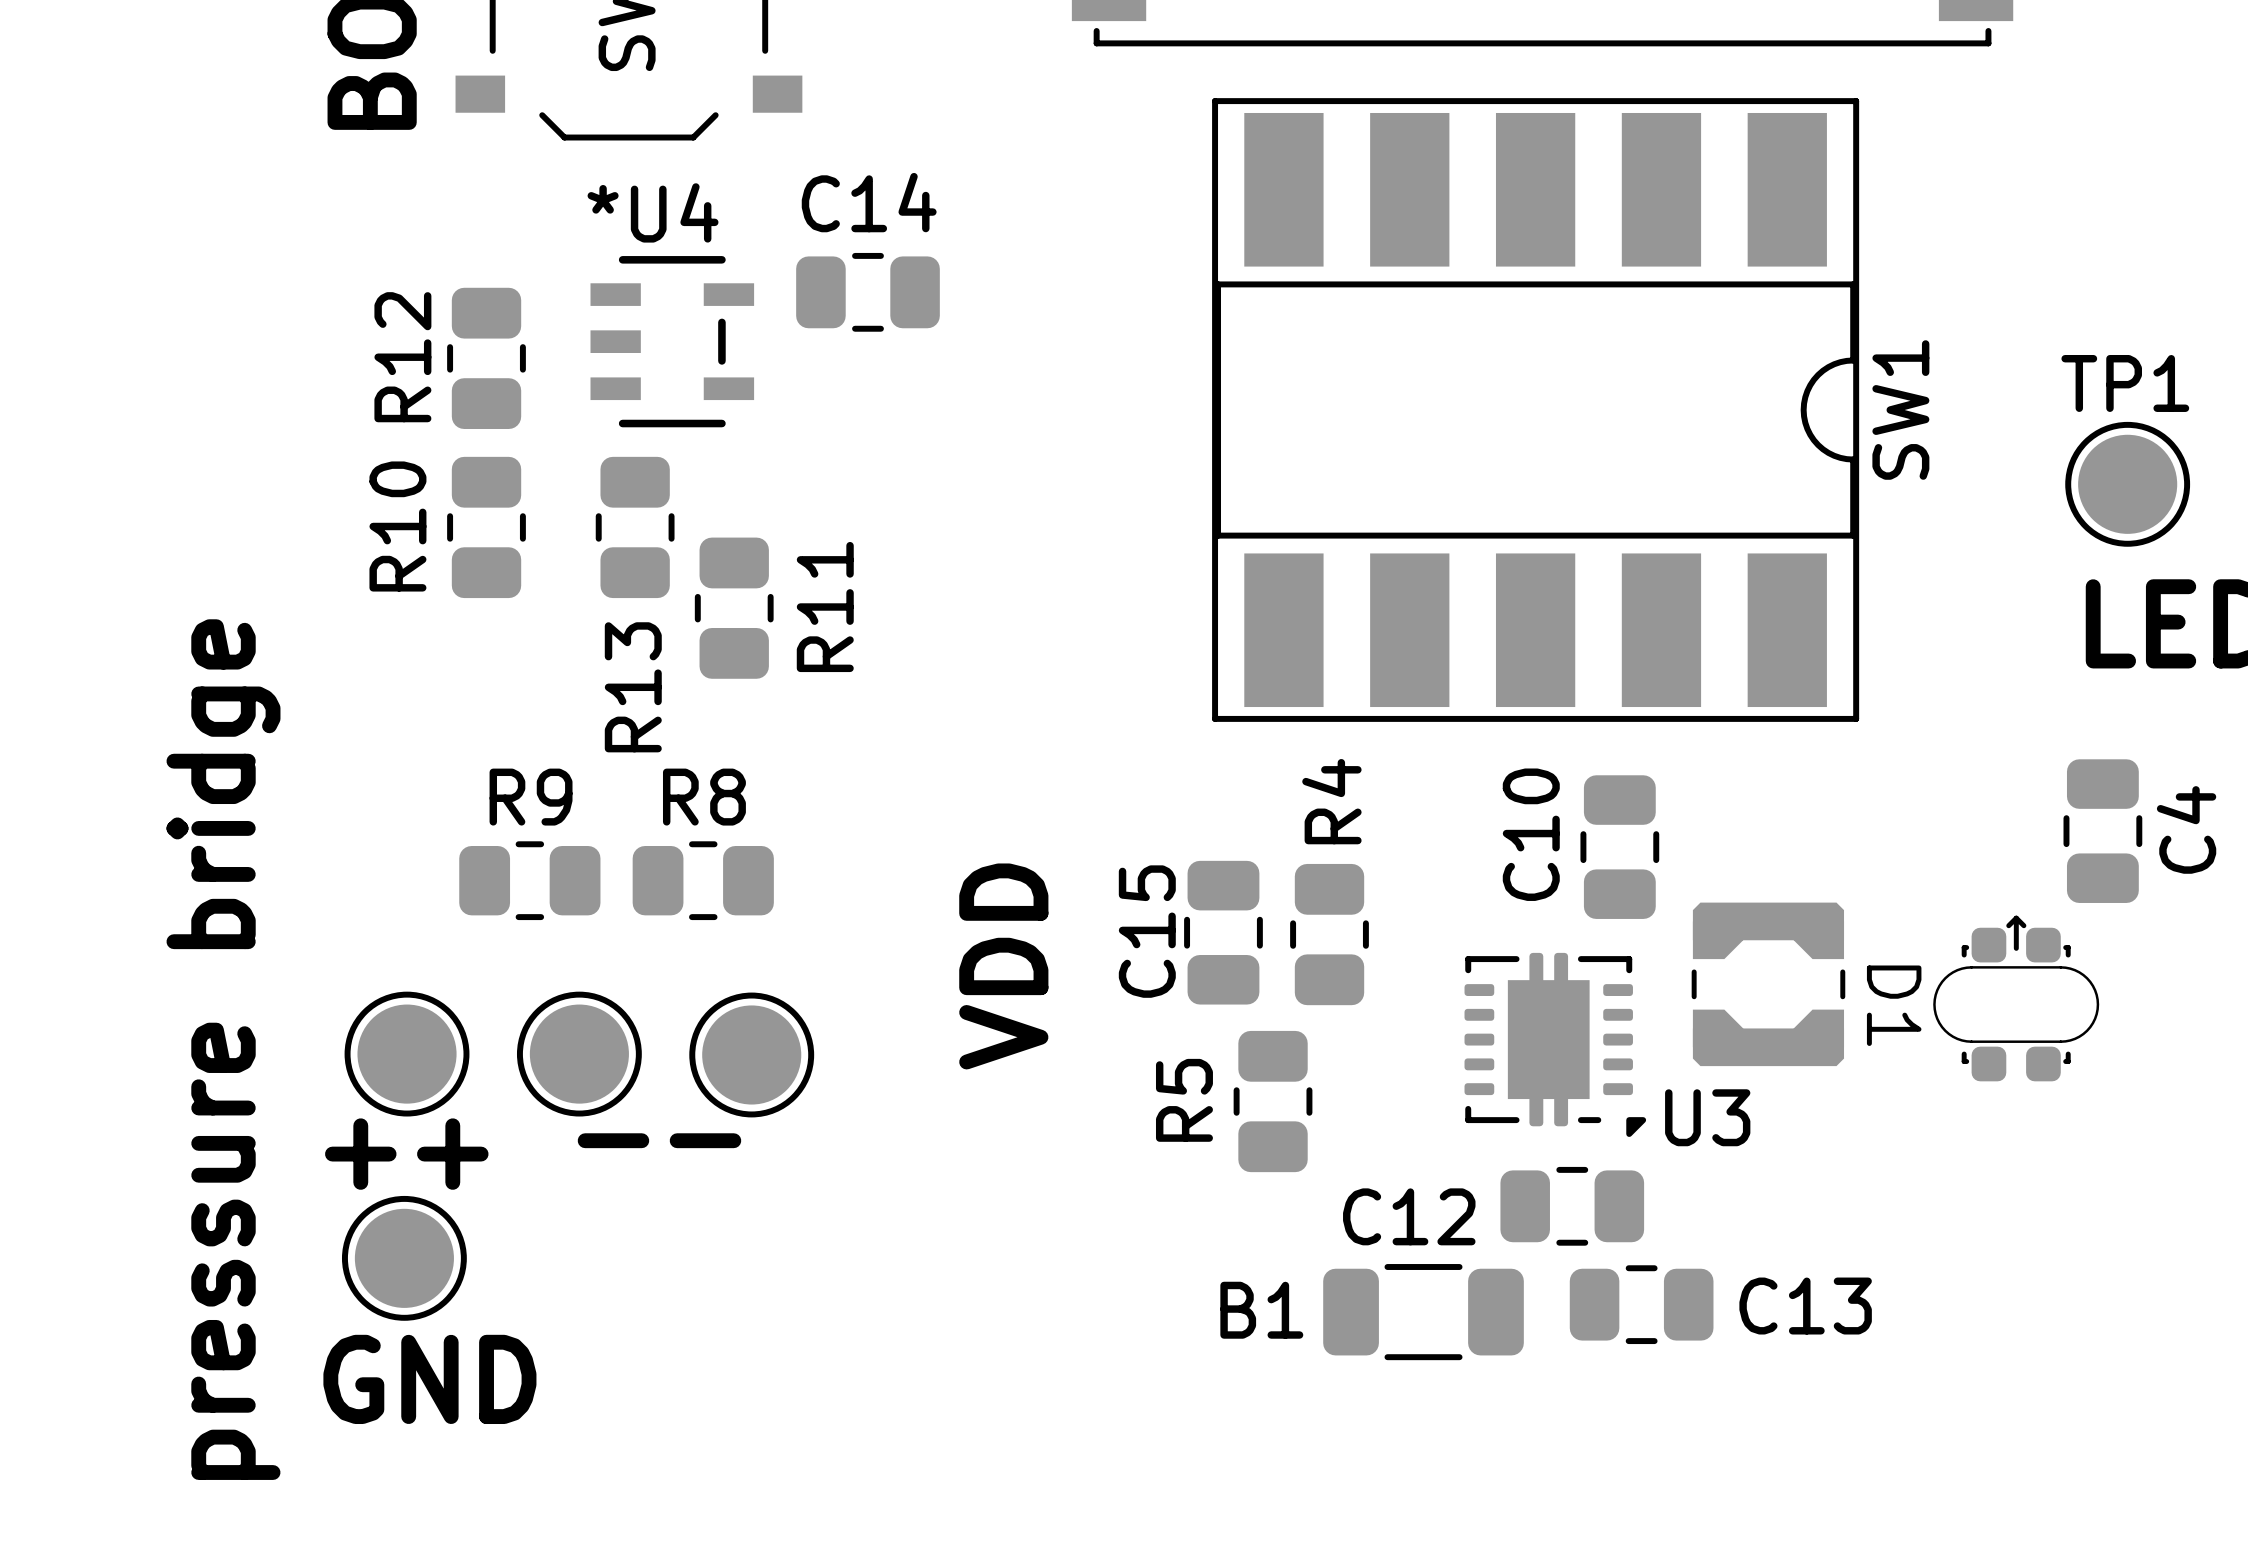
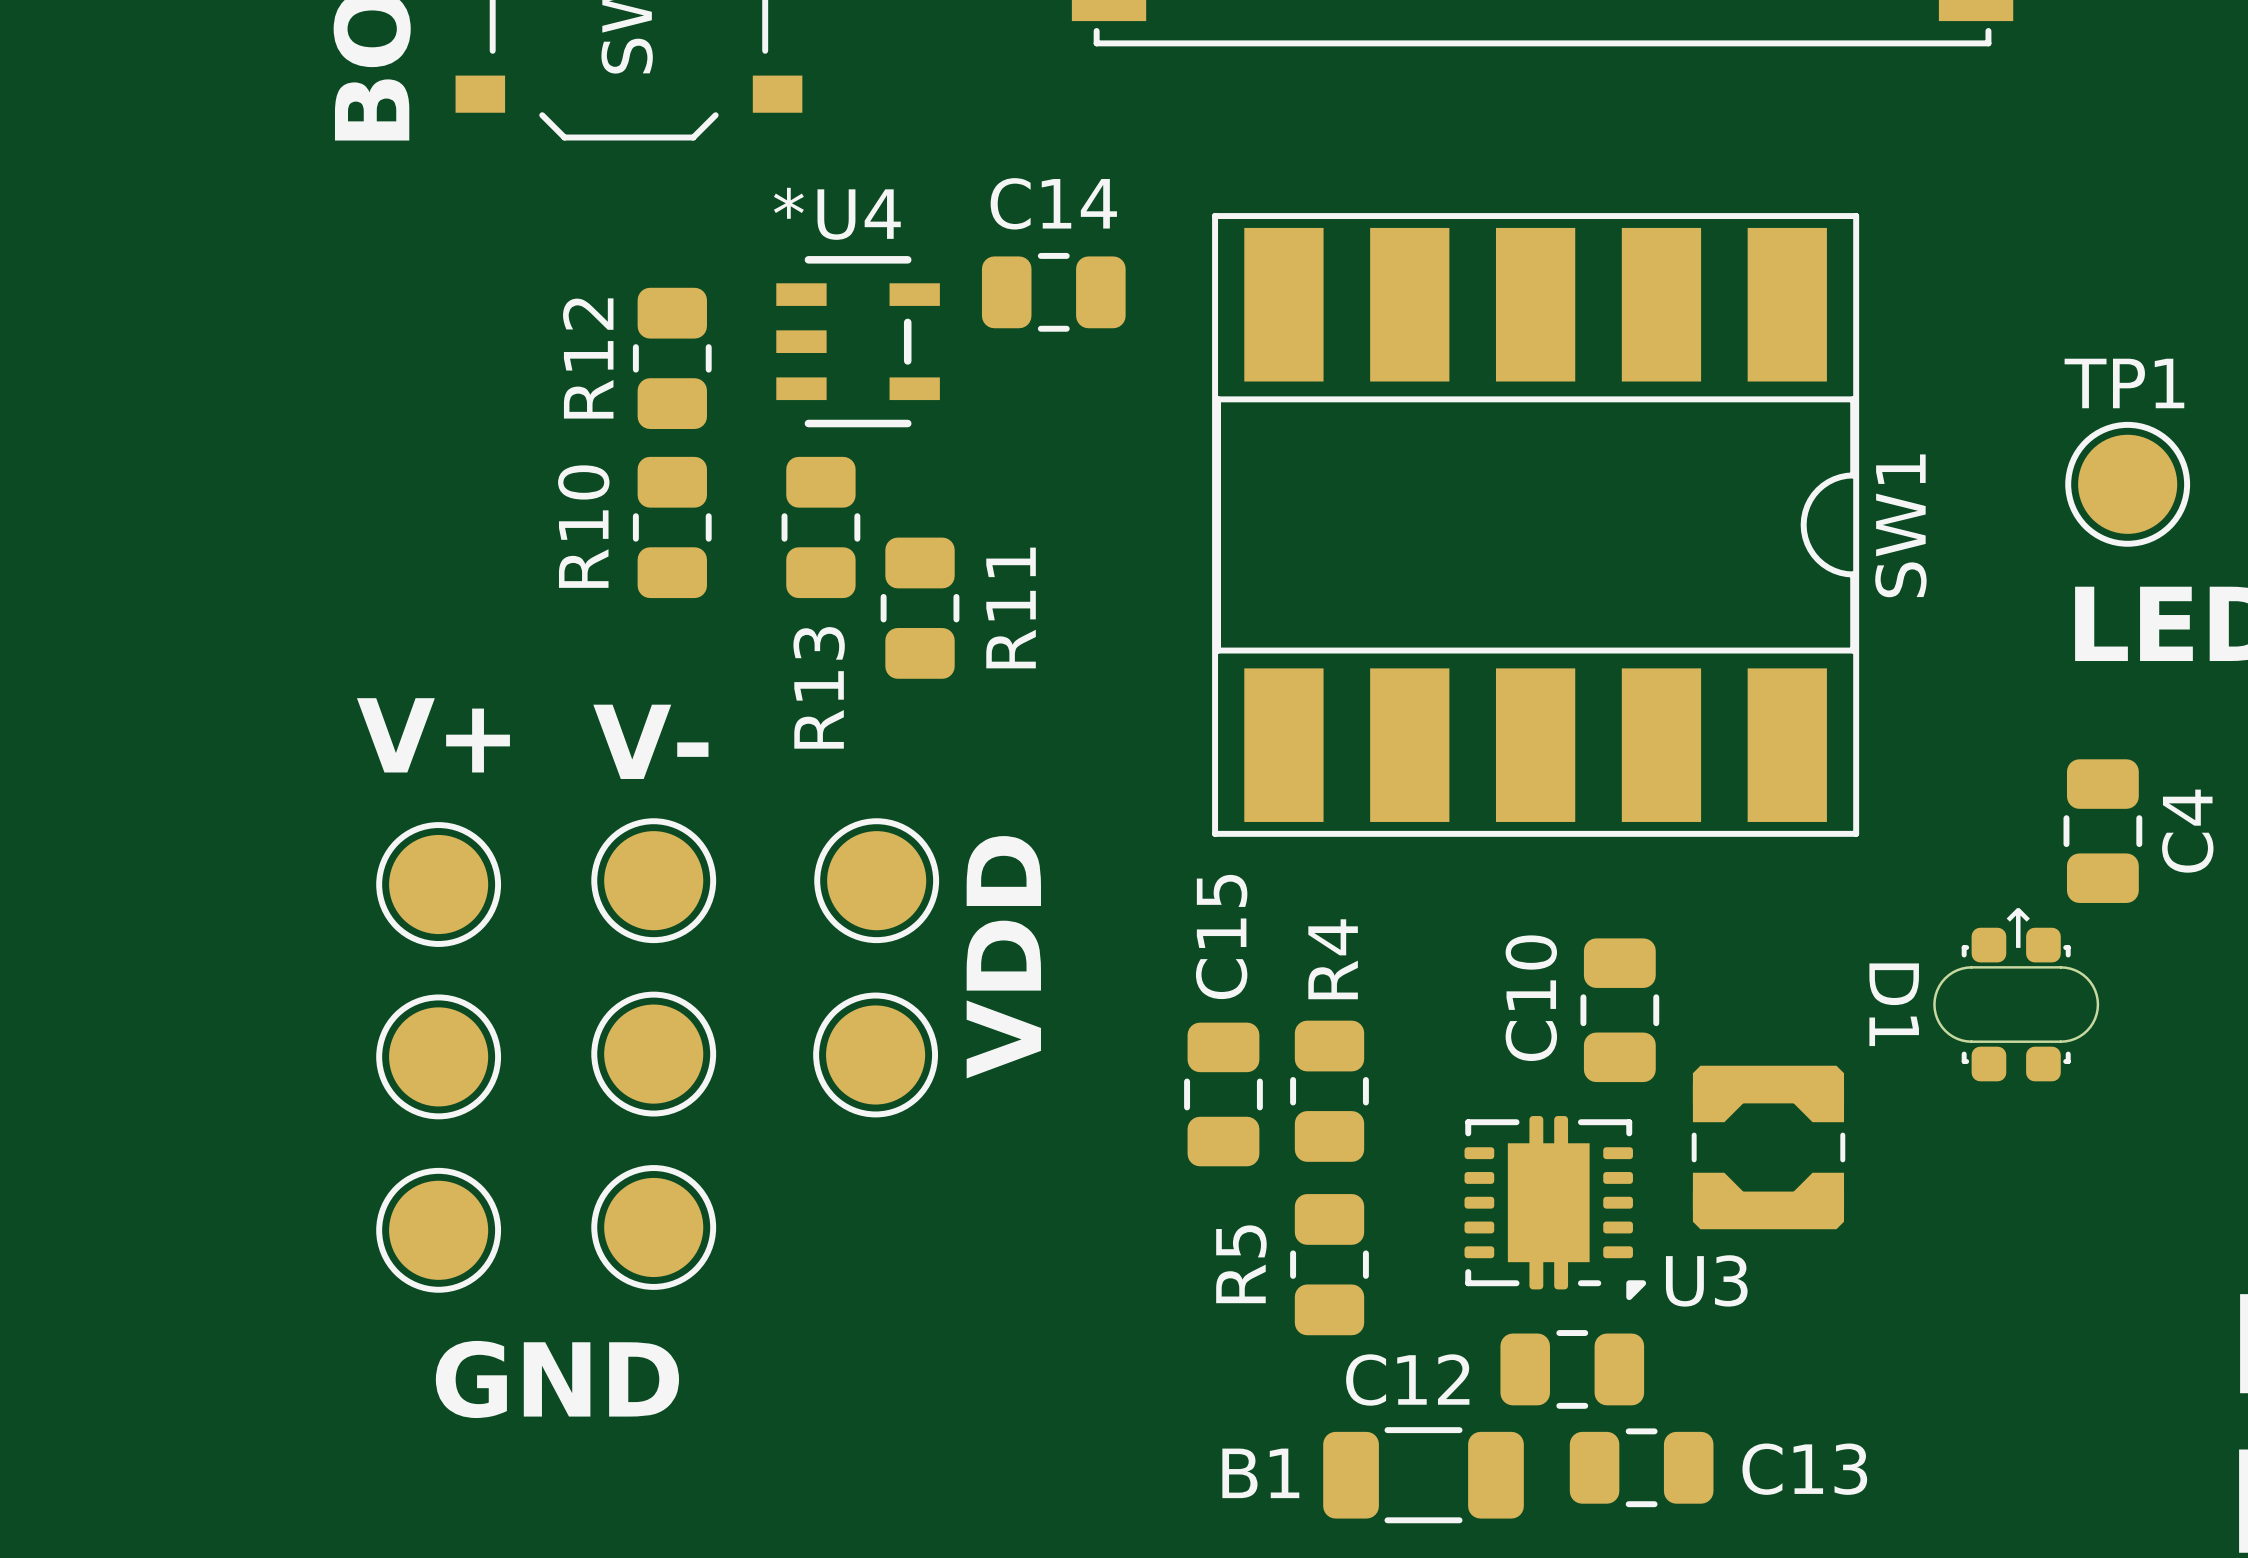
C14 position: (868, 292) -> (1053, 292)
U4 position: (672, 341) -> (858, 341)
R12 position: (486, 358) -> (672, 358)
SW1 position: (1535, 410) -> (1535, 524)
R10 position: (486, 527) -> (672, 527)
R13 position: (635, 527) -> (820, 527)
R11 position: (734, 608) -> (920, 608)
text: none -> V+ (433, 735)
text: none -> V- (650, 741)
C10 position: (1619, 847) -> (1619, 1010)
R9: (529, 880) -> none
part: none -> (653, 880)
R8: (703, 880) -> none
part: none -> (876, 880)
part: none -> (438, 884)
C15 name position: C15 (1147, 931) -> C15 (1221, 936)
C15 position: (1223, 932) -> (1223, 1094)
R4 position: (1329, 934) -> (1329, 1091)
part position: (1768, 984) -> (1768, 1147)
U3 position: (1555, 1044) -> (1555, 1208)
text: pressure bridge (223, 1049) -> none
part position: (407, 1054) -> (438, 1056)
part: (579, 1054) -> none
part: none -> (653, 1054)
part: (751, 1054) -> none
part: none -> (875, 1054)
R5 position: (1273, 1101) -> (1329, 1264)
text: -- (659, 1140) -> none
text: ++ (406, 1154) -> none
C12 position: (1572, 1206) -> (1572, 1369)
part: none -> (653, 1227)
part position: (404, 1258) -> (438, 1230)
C13 position: (1641, 1304) -> (1641, 1467)
B1 position: (1423, 1312) -> (1423, 1475)
text position: GND (429, 1379) -> GND (557, 1379)

